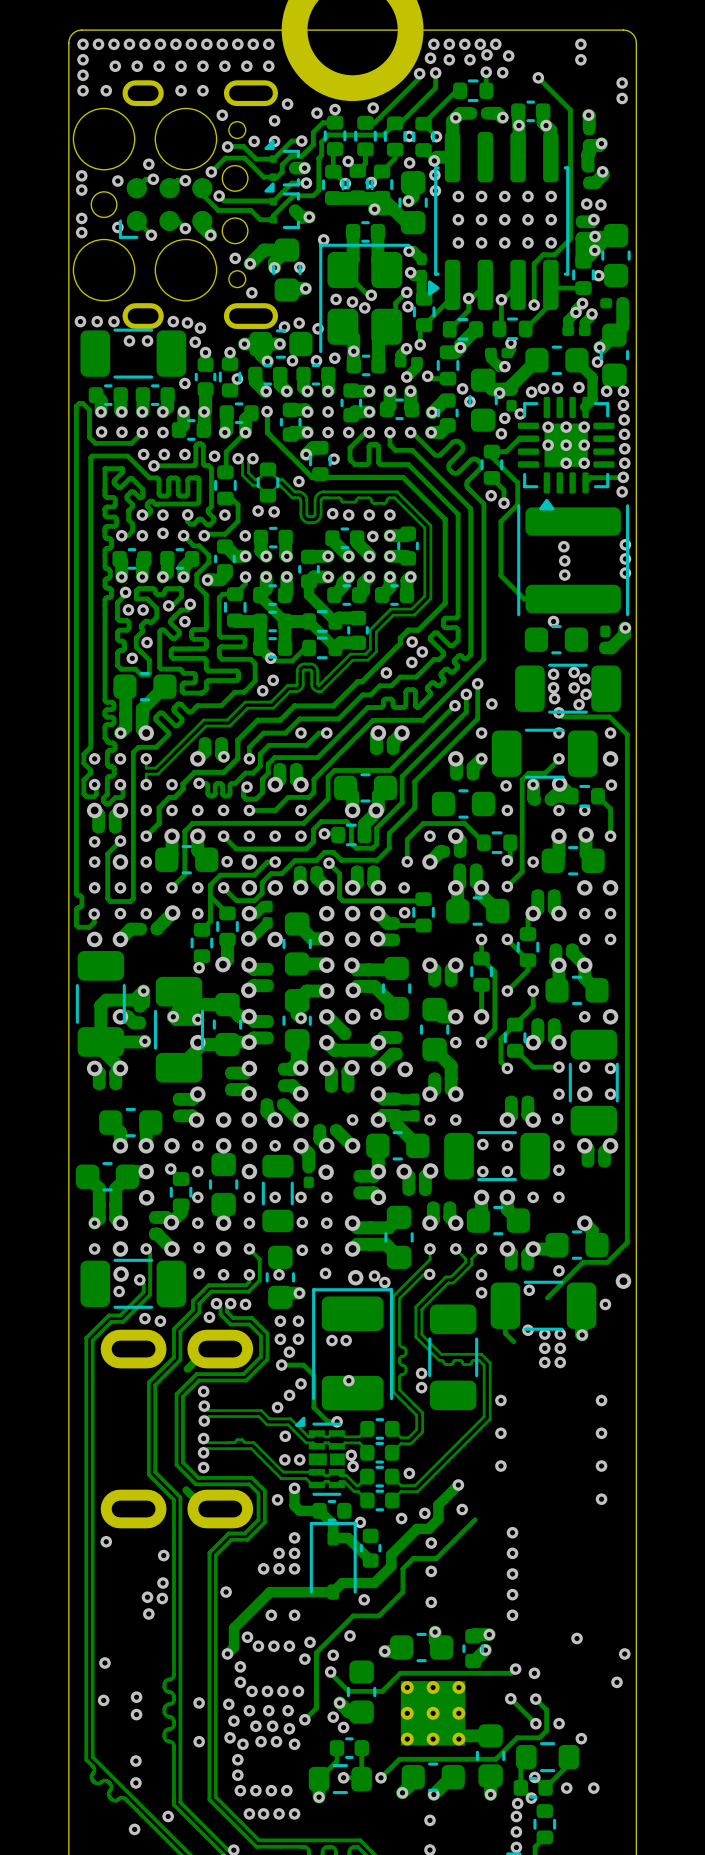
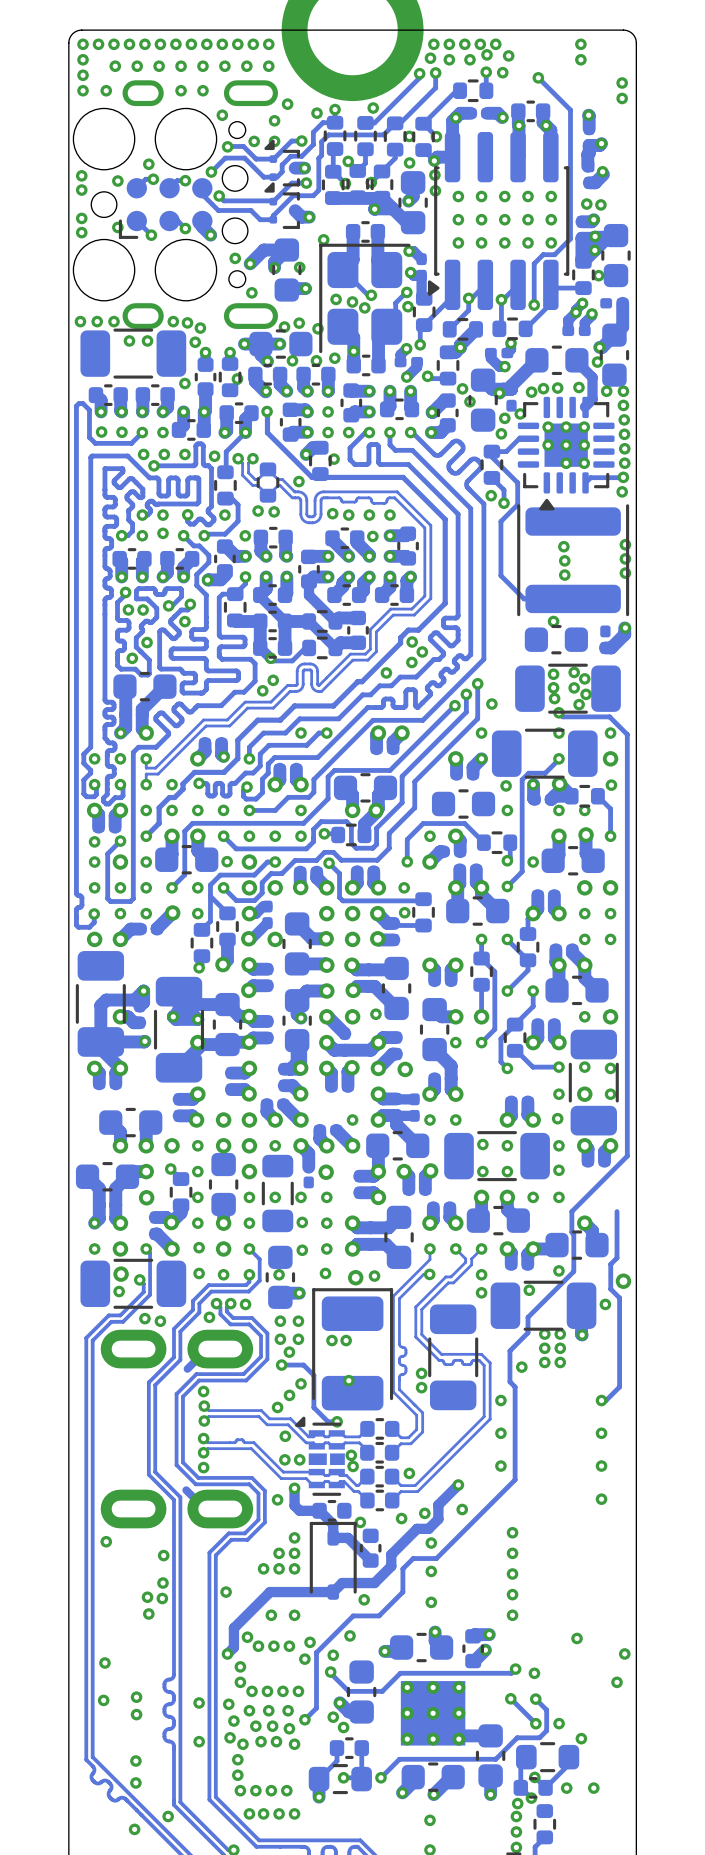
track: (627, 1156) (627, 1242) (607, 1262) (583, 1262) (573, 1271) -> (627, 1156) (571, 1211) (573, 1271)
track: none -> (617, 1211) (617, 1258) (610, 1264) (610, 1289) (619, 1297) (619, 1386) (606, 1400) (601, 1400)
via: (384, 1282) -> none
track: none -> (547, 1297) (528, 1317) (528, 1332) (509, 1350) (509, 1381) (515, 1386) (515, 1479) (475, 1519)
track: (505, 1305) (505, 1333) (513, 1341) -> none
via position: (528, 1330) -> (521, 1367)

